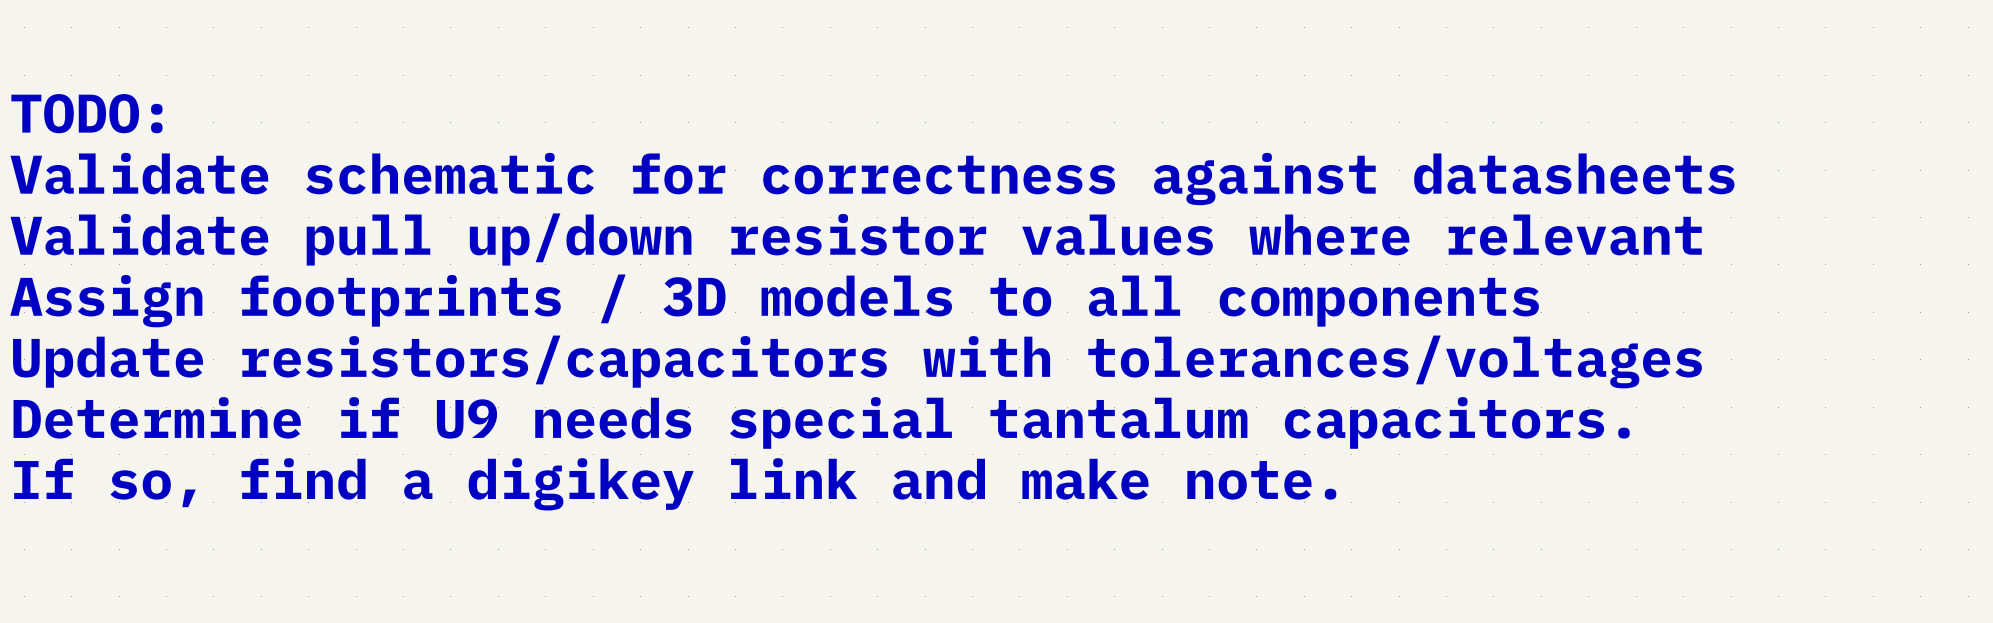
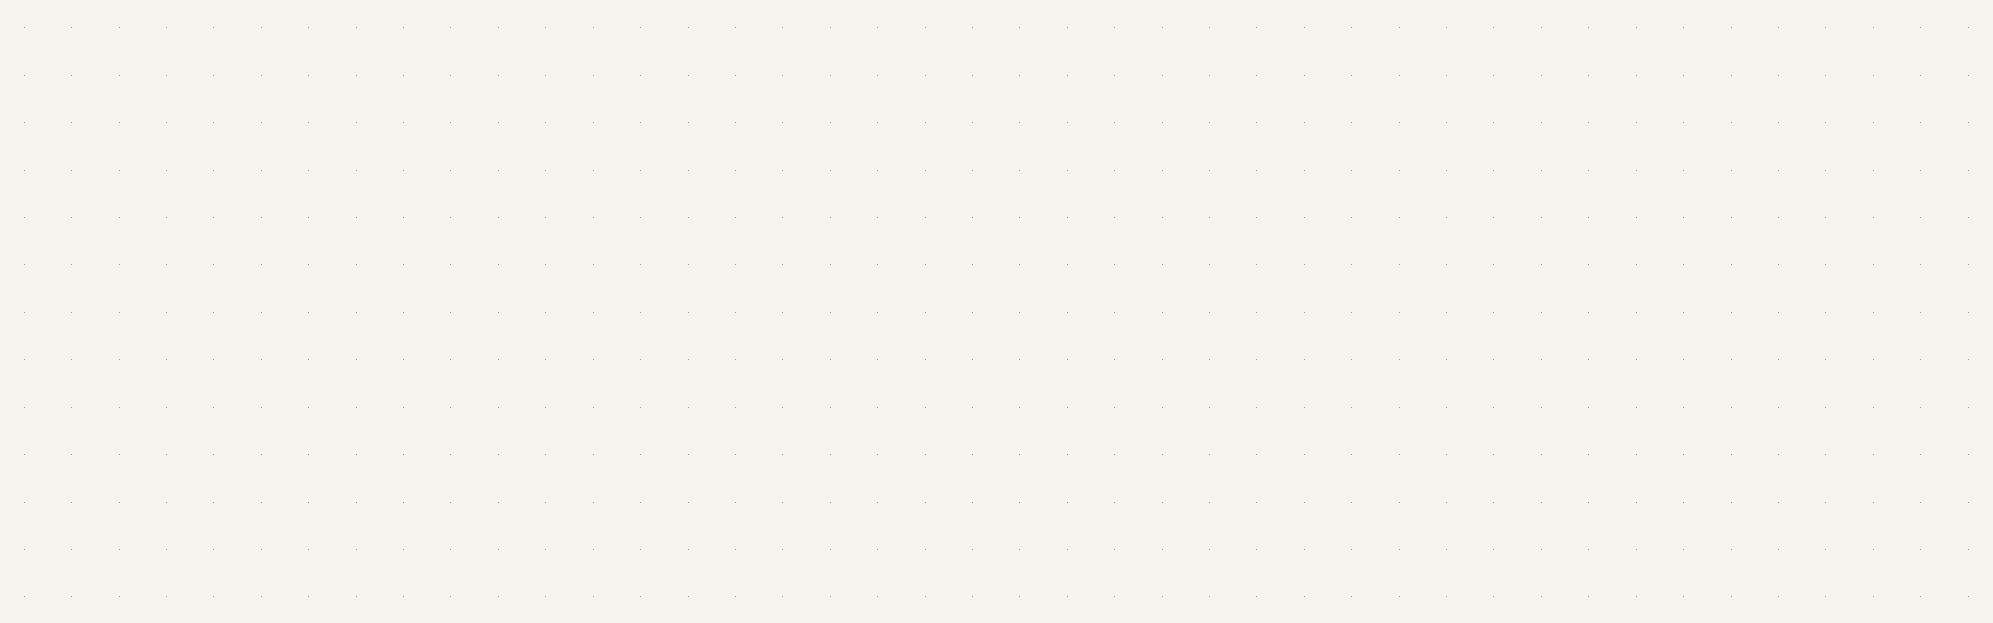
text: TODO: (86, 113) -> none
text: Validate schematic for correctness against datasheets (872, 179) -> none
text: Validate pull up/down resistor values where relevant (856, 239) -> none
text: Assign footprints / 3D models to all components (774, 300) -> none
text: Update resistors/capacitors with tolerances/voltages (857, 361) -> none
text: Determine if U9 needs special tantalum capacitors. (821, 422) -> none
text: If so, find a digikey link and make note. (675, 484) -> none

